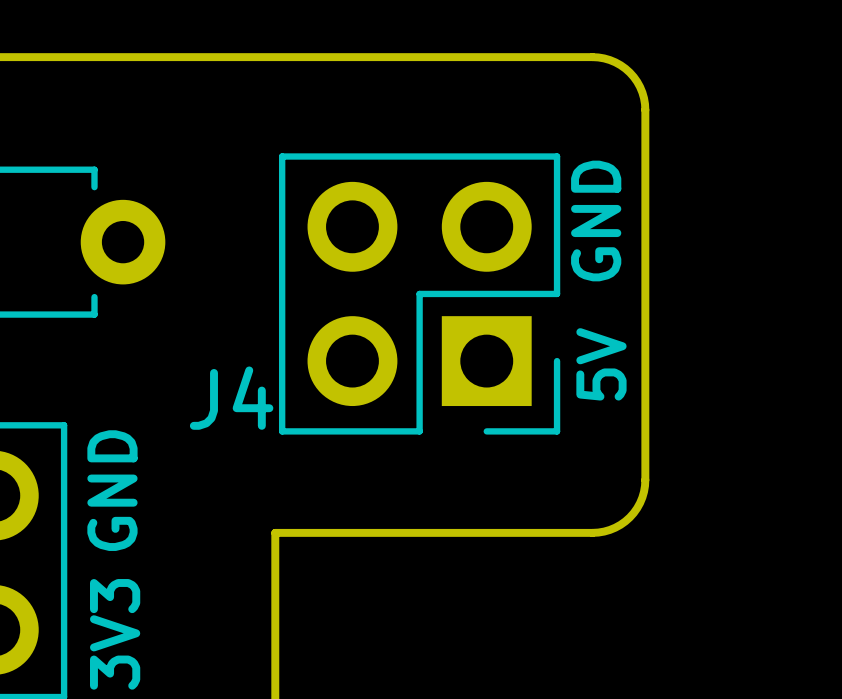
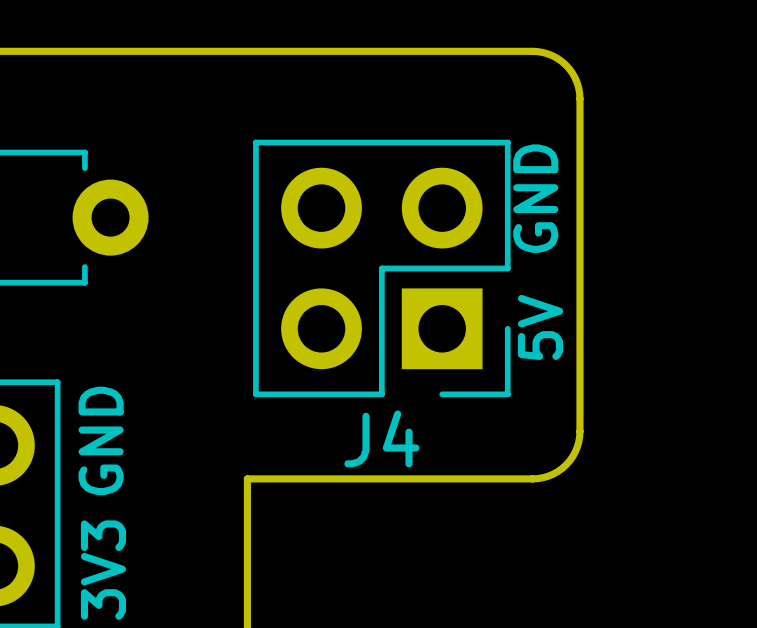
J4 footprint: [278, 153, 561, 435] -> [253, 139, 511, 398]
J4 name position: J4 (231, 398) -> J4 (381, 438)

